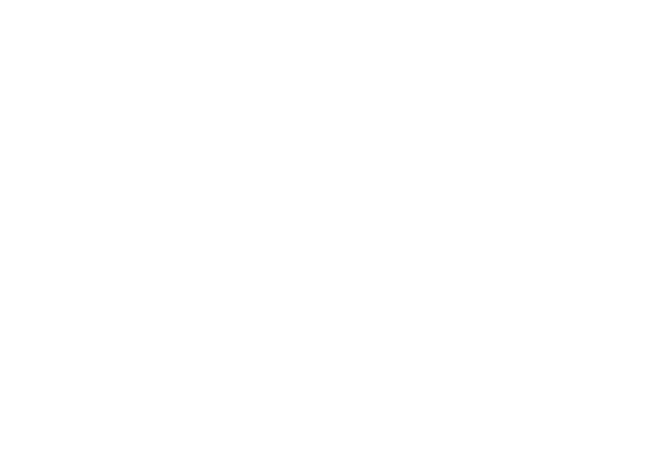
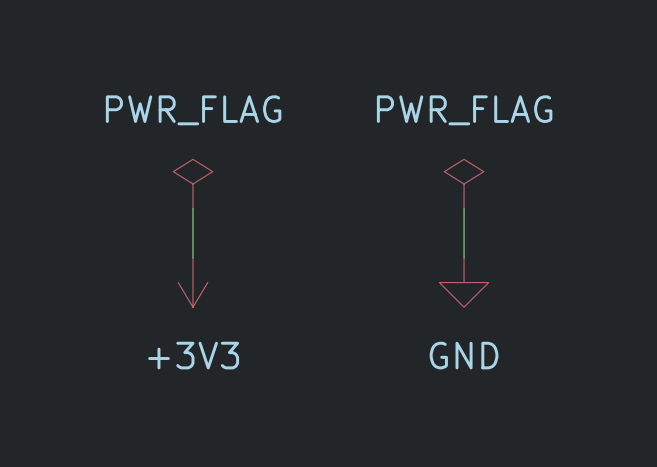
power symbol: none -> PWR_FLAG (192, 184)
power symbol: none -> PWR_FLAG (464, 184)
wire: none -> (192, 208) (192, 257)
wire: none -> (464, 208) (464, 257)
power symbol: none -> +3V3 (192, 282)
power symbol: none -> GND (464, 282)

